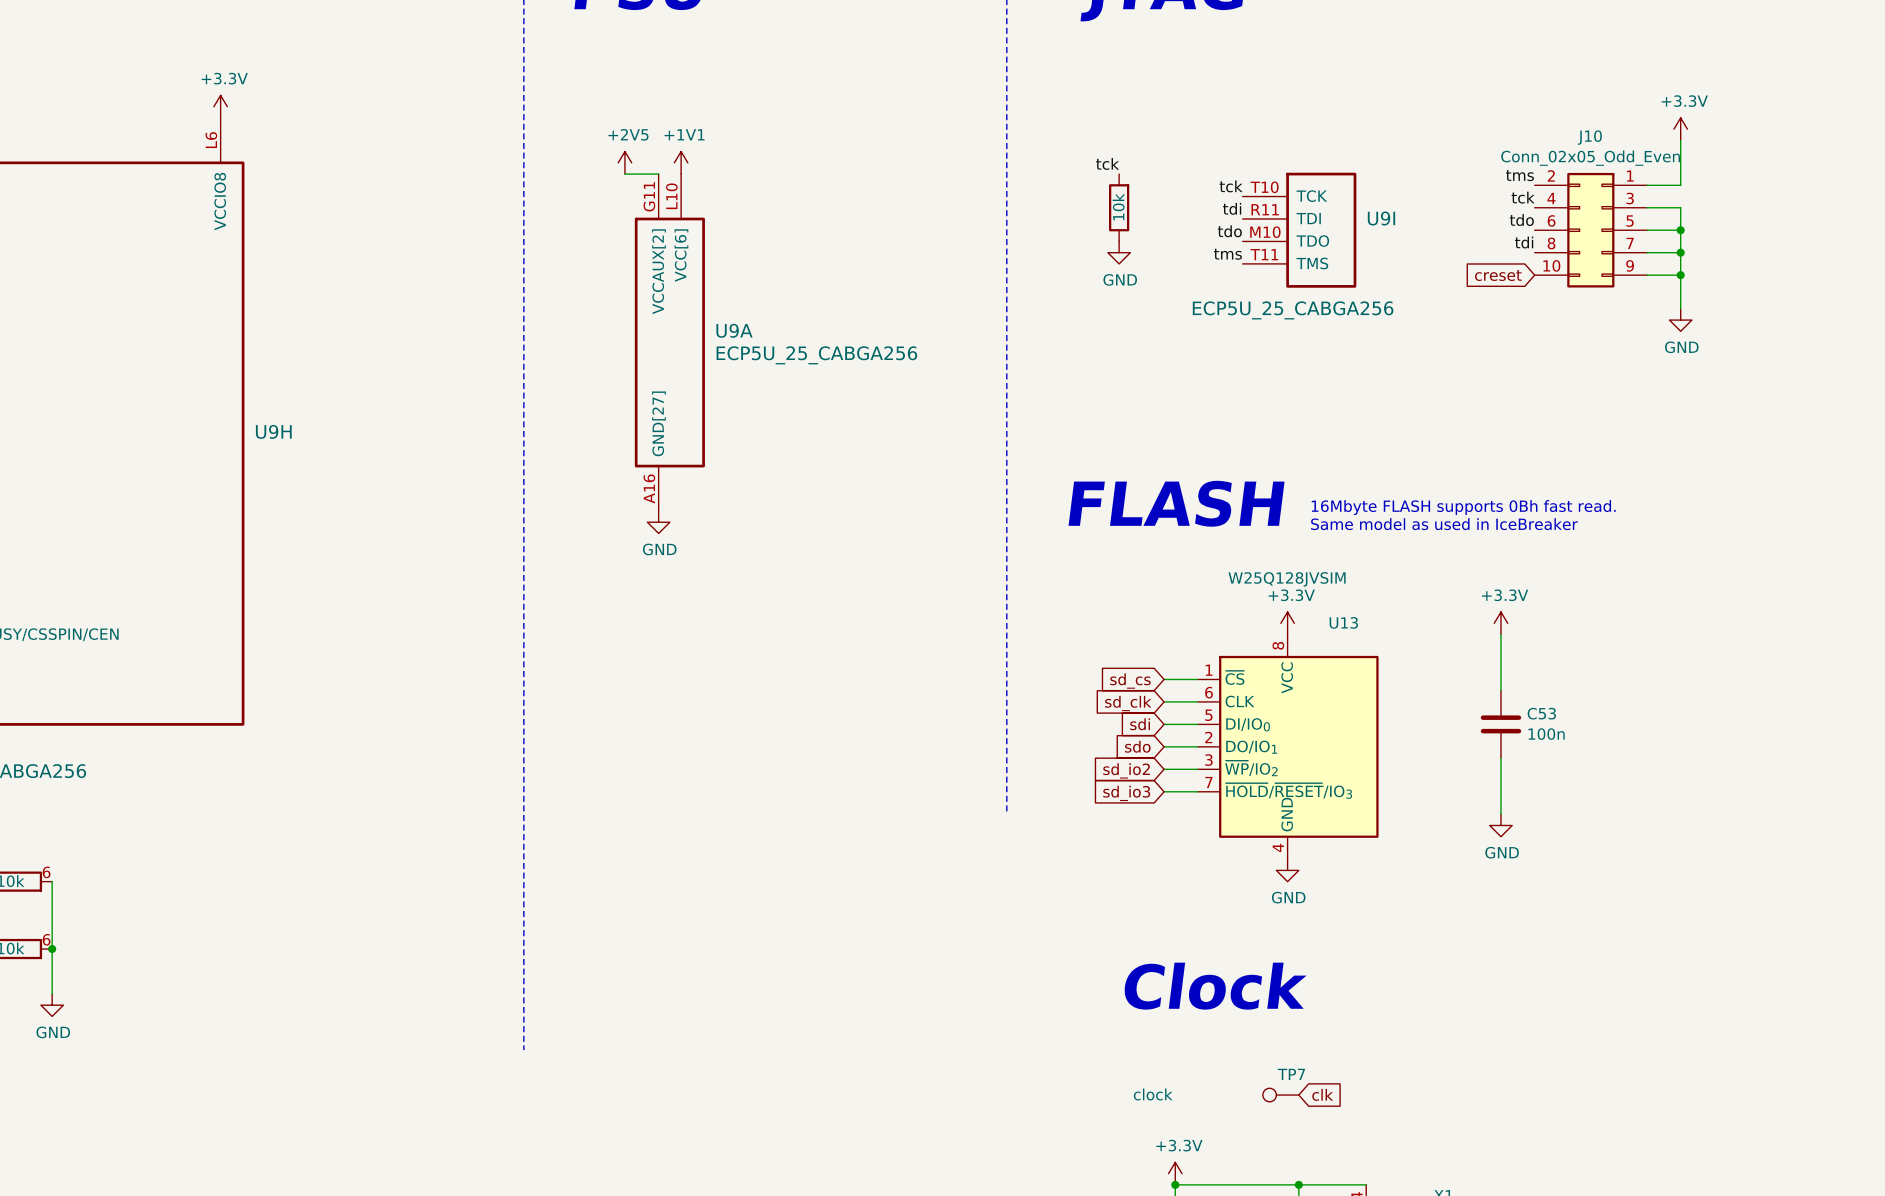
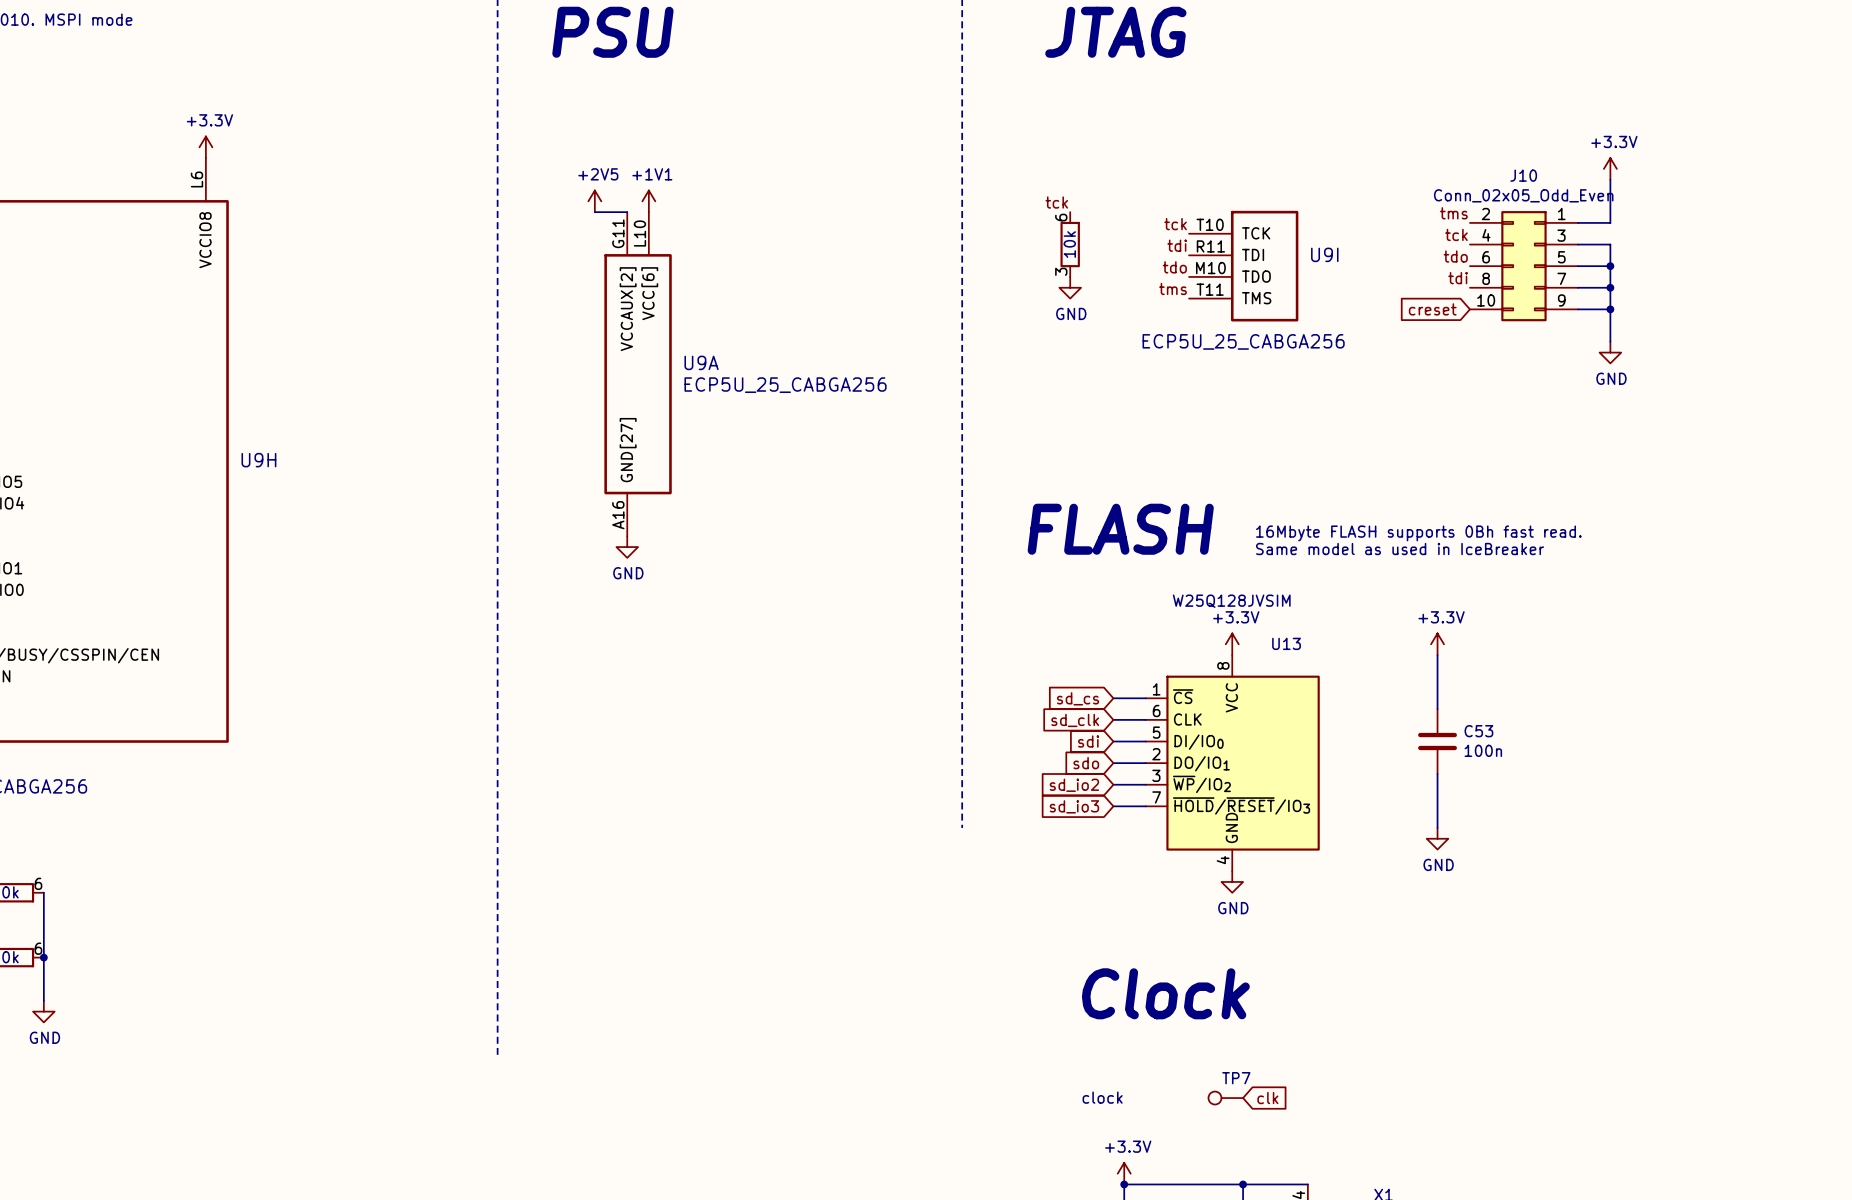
part pin number: none -> 6 (1061, 217)
part pin number: none -> 3 (1061, 271)

